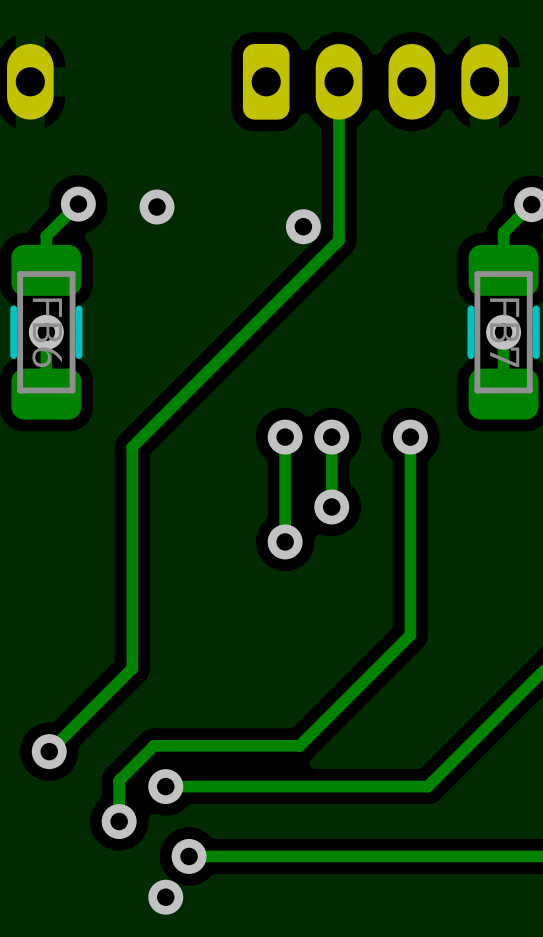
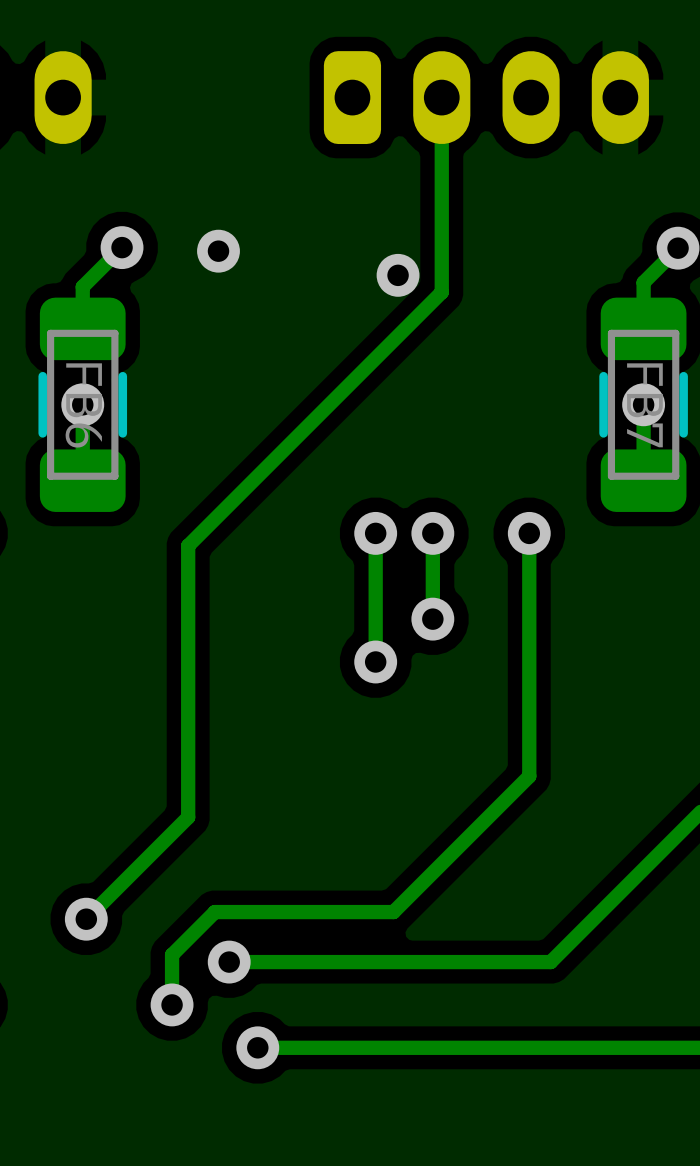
via: (165, 897) -> none

